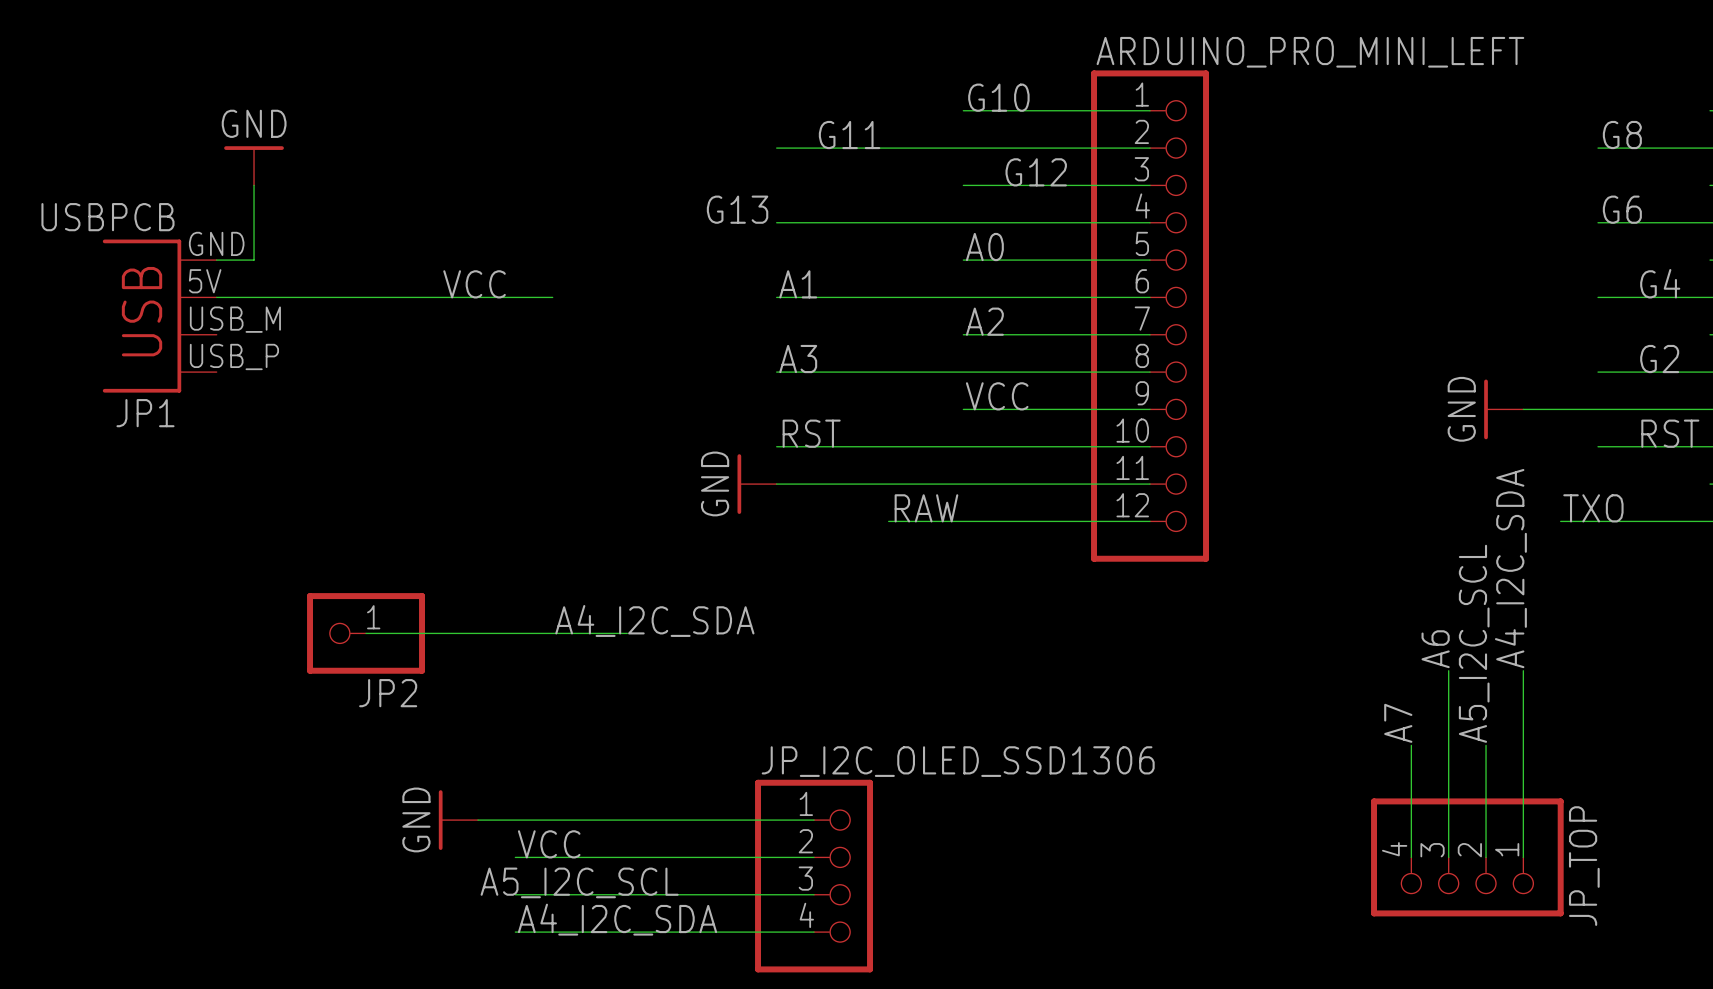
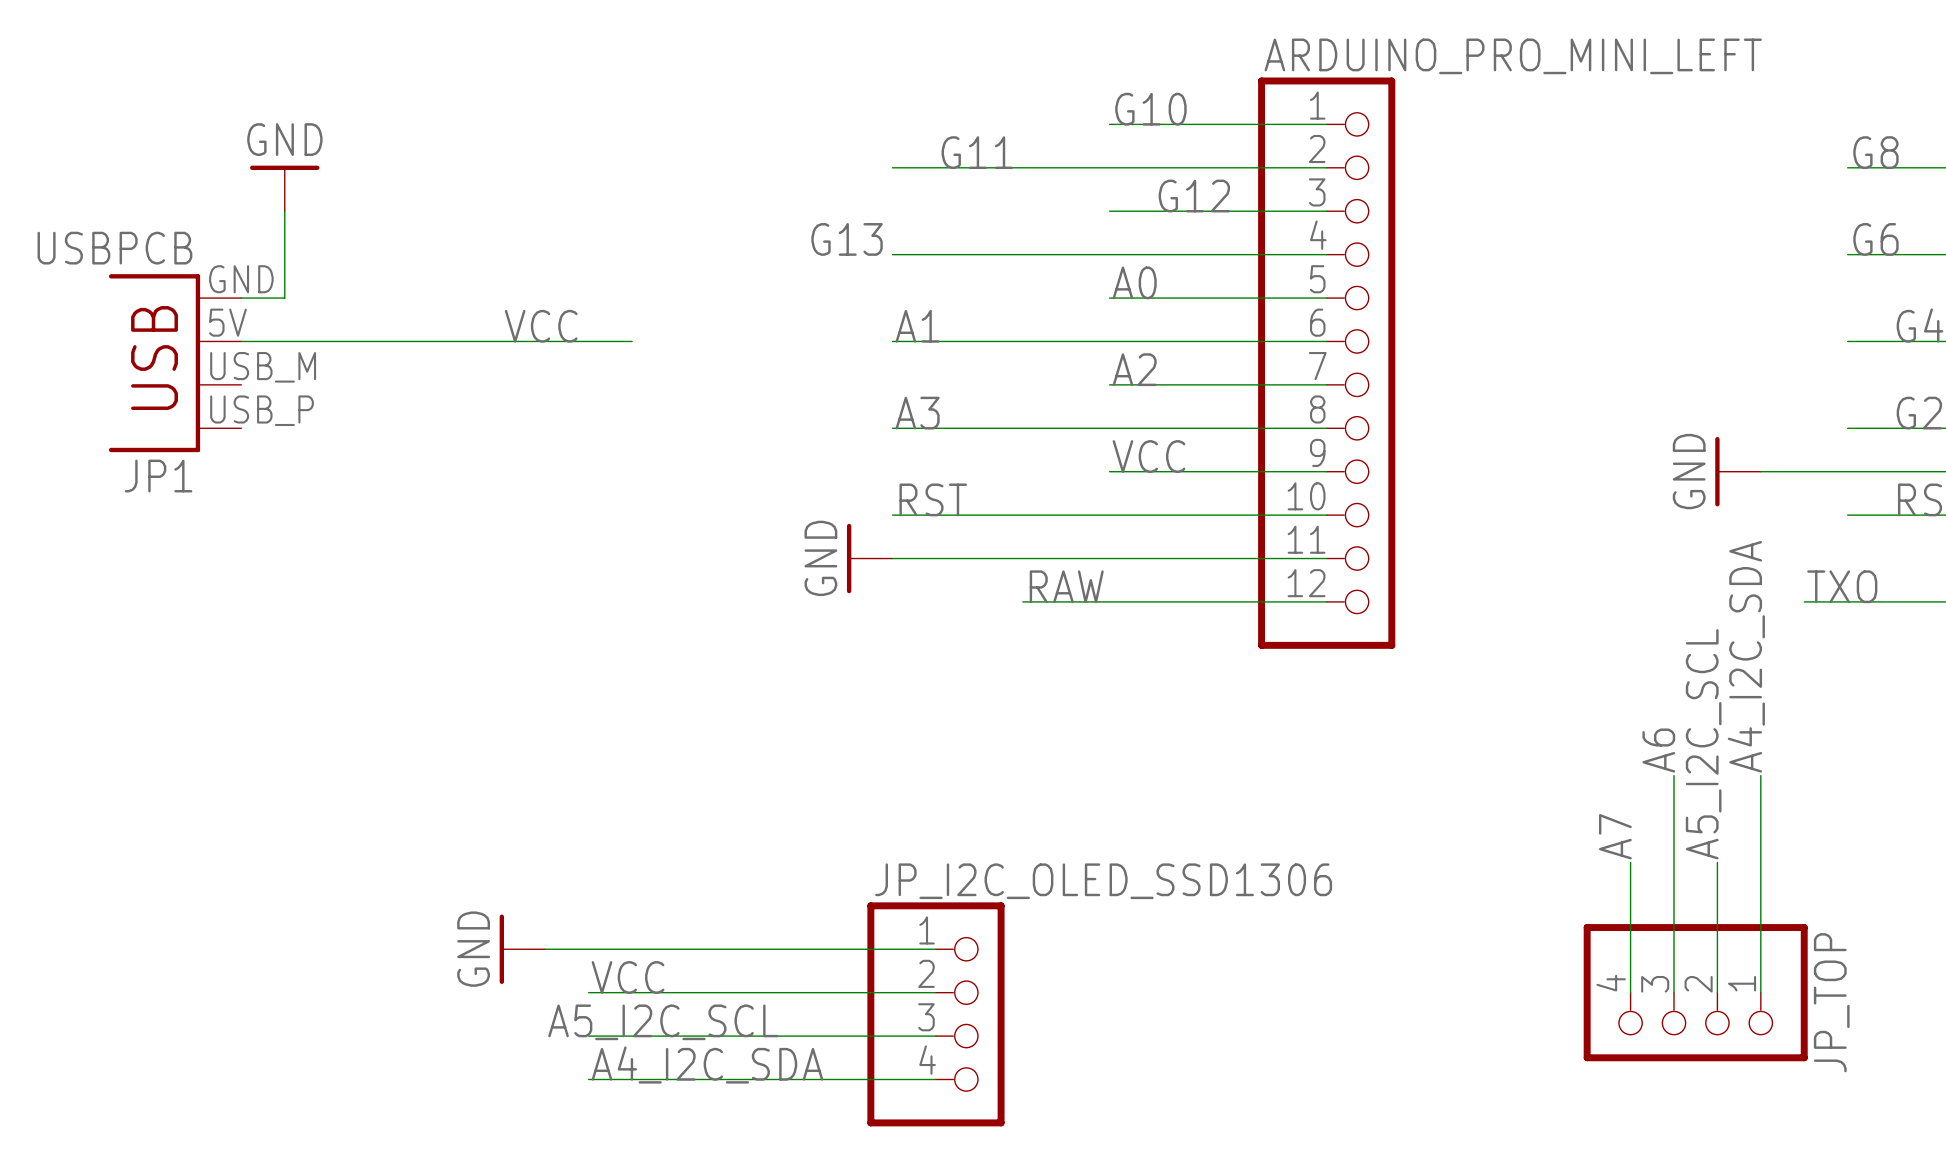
label: A4_I2C_SDA (654, 620) -> none
wire: (366, 633) (627, 633) -> none
JP2: (366, 633) -> none

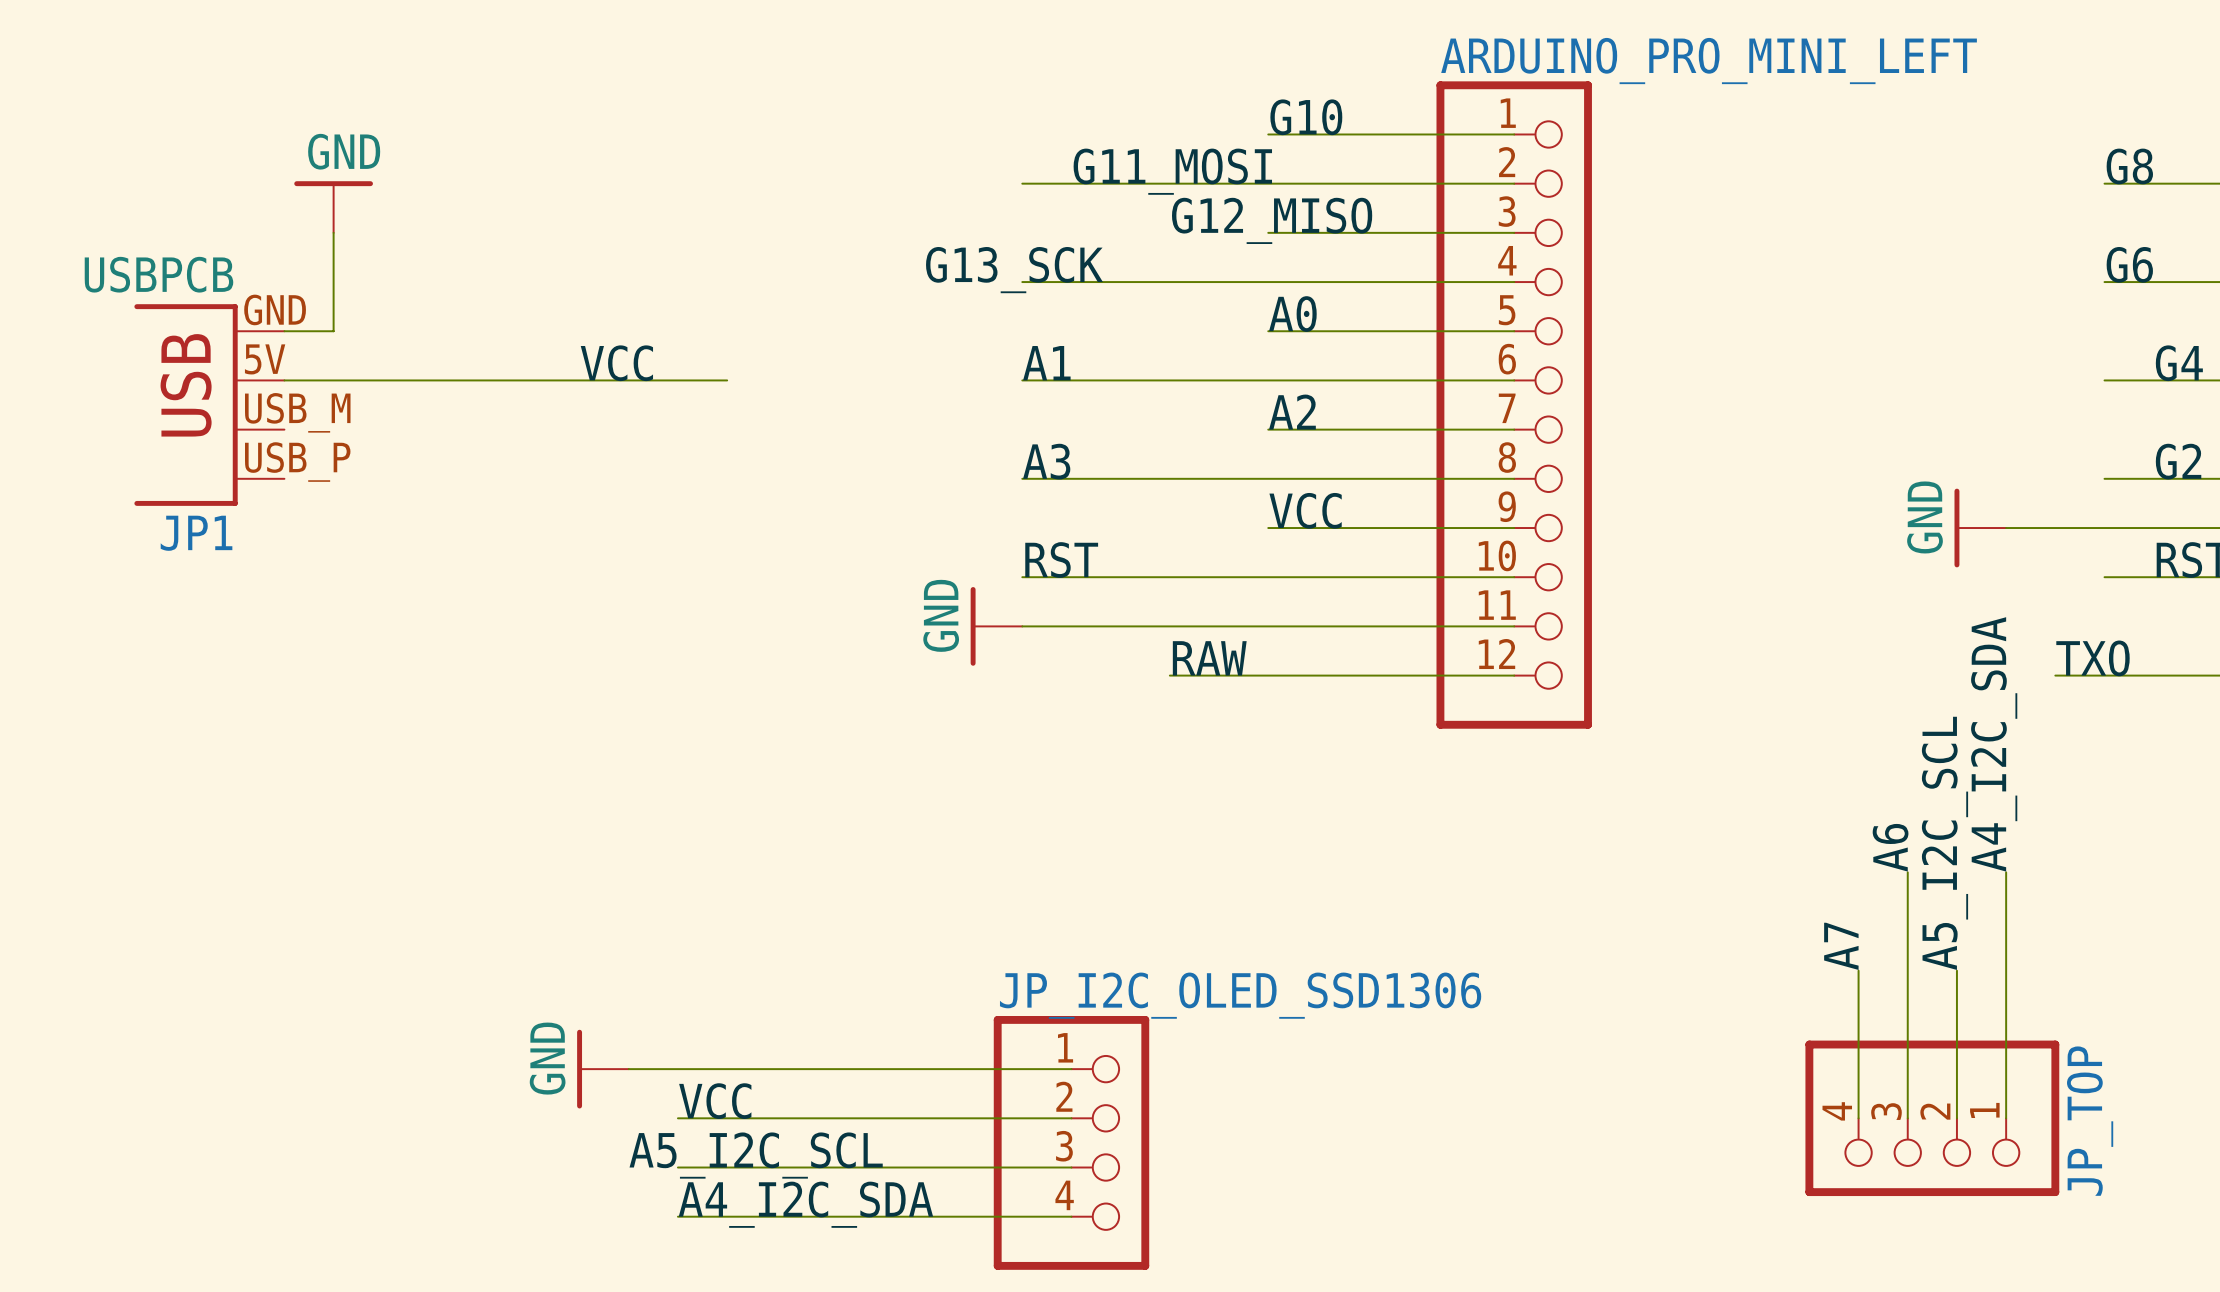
label: G11 (977, 152) -> G11_MOSI (1172, 171)
label: G12 (1194, 196) -> none
label: none -> G12_MISO (1272, 220)
label: G13 (847, 239) -> G13_SCK (1014, 270)

